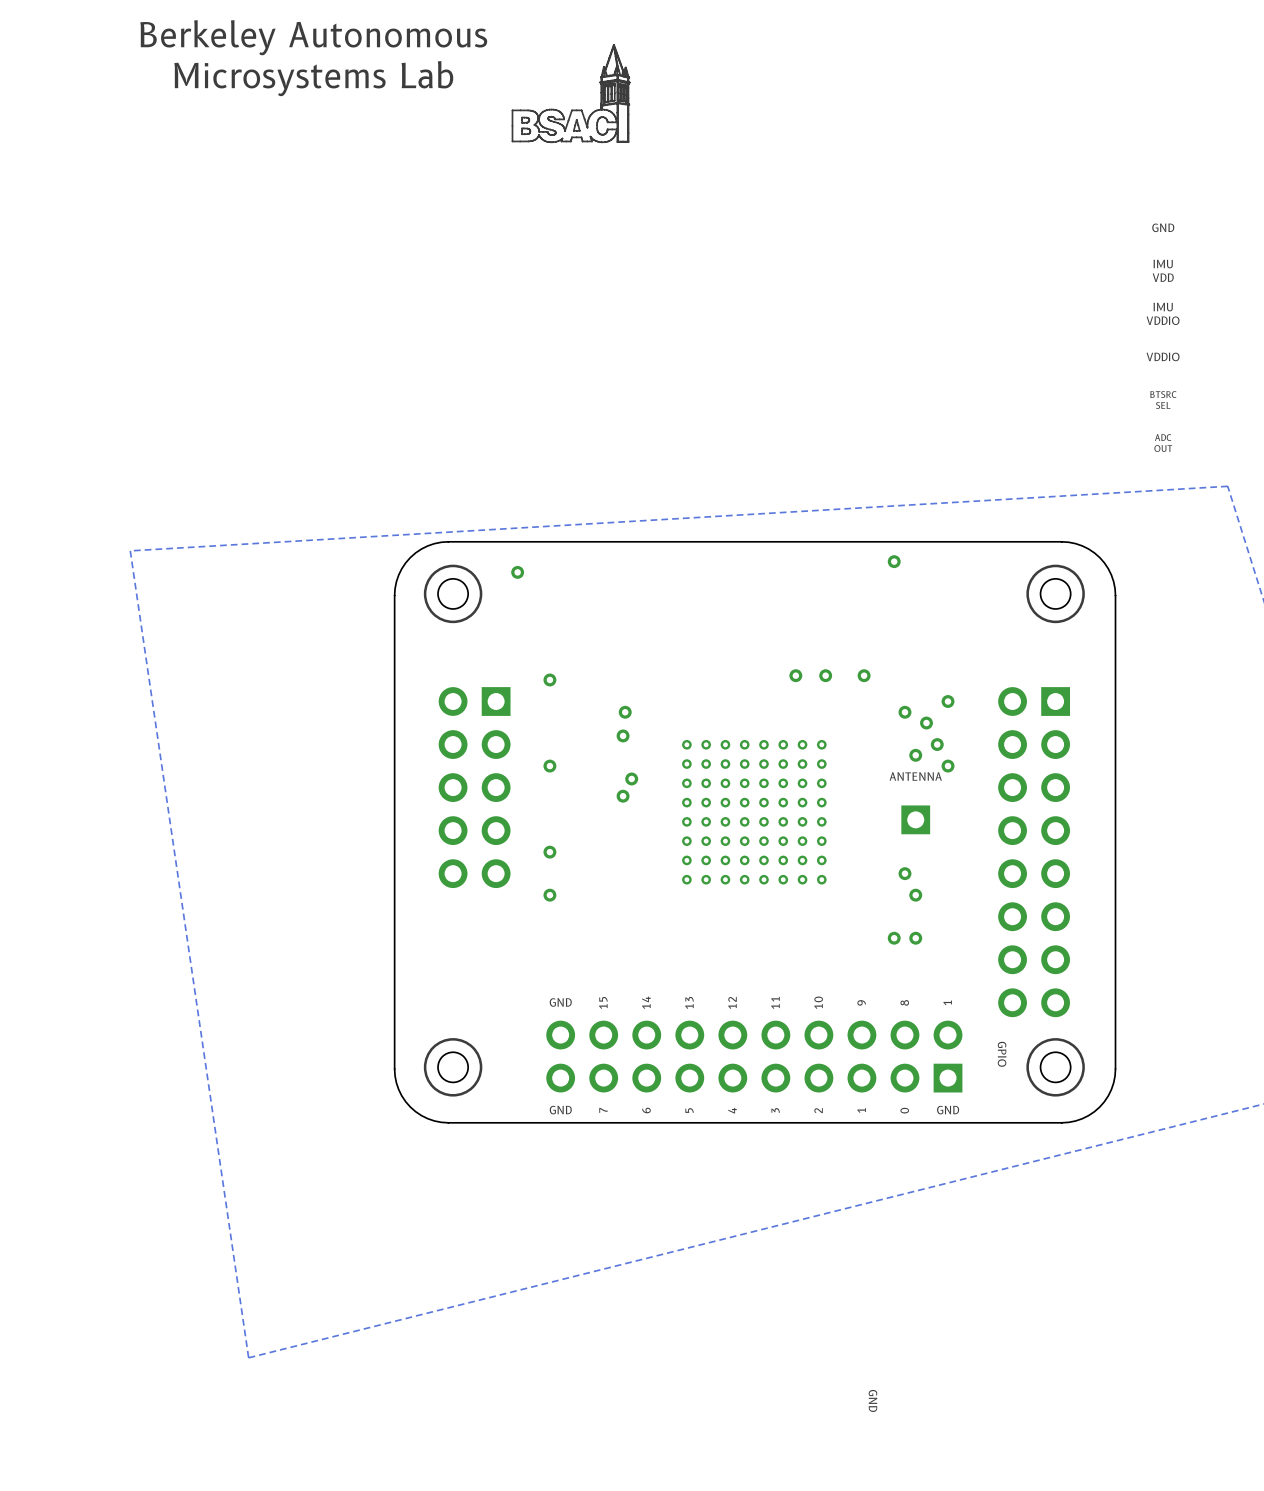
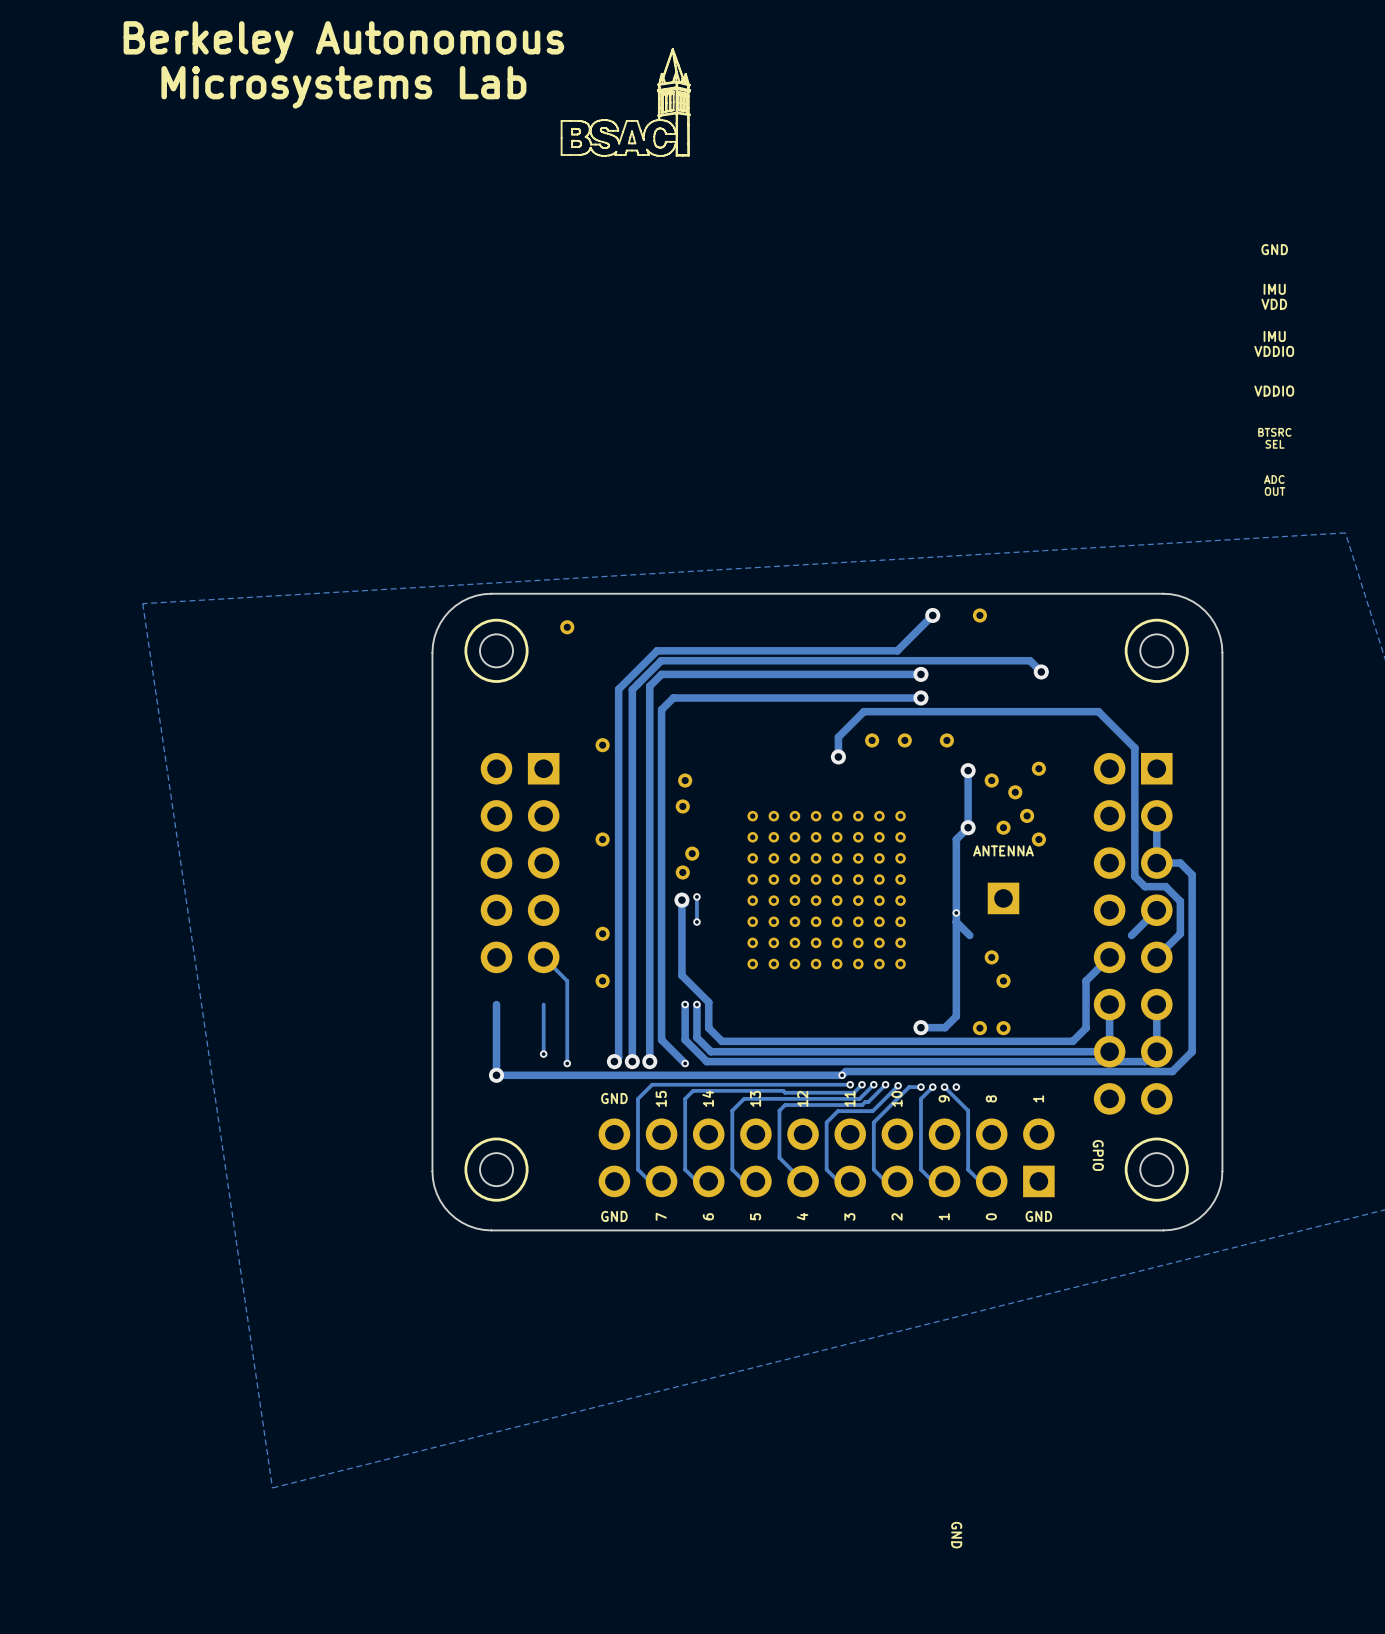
track: none -> (932, 615) (897, 650) (657, 650) (618, 689) (618, 1057) (614, 1061)
via: none -> (932, 615)
track: none -> (1041, 671) (1030, 660) (661, 660) (632, 689) (632, 1061)
via: none -> (1041, 671)
track: none -> (920, 674) (661, 674) (649, 686) (649, 1061)
via: none -> (920, 674)
track: none -> (920, 698) (673, 698) (661, 709) (661, 1039) (685, 1063)
via: none -> (920, 698)
track: none -> (838, 756) (838, 737) (863, 711) (1098, 711) (1134, 748) (1134, 876) (1144, 886) (1165, 886) (1180, 901) (1180, 933) (1156, 957)
via: none -> (838, 756)
track: none -> (968, 770) (968, 827) (956, 839) (956, 1016) (945, 1027) (920, 1027)
via: none -> (968, 770)
track: none -> (1156, 815) (1156, 863) (1180, 863) (1192, 874) (1192, 1051) (1172, 1071) (845, 1071) (842, 1075) (496, 1075) (496, 1004)
via: none -> (968, 827)
track: none -> (696, 896) (696, 922)
via: none -> (696, 896)
via: none -> (681, 900)
track: none -> (685, 903) (681, 900) (681, 975) (708, 1002) (708, 1028) (721, 1041) (1072, 1041) (1086, 1028) (1086, 980) (1109, 957)
track: none -> (1156, 910) (1131, 935)
via: none -> (956, 912)
via: none -> (696, 922)
track: none -> (956, 922) (969, 935)
track: none -> (543, 957) (567, 980) (567, 1063)
track: none -> (543, 1004) (543, 1054)
via: none -> (685, 1004)
via: none -> (696, 1004)
track: none -> (1109, 1004) (1109, 1039) (1097, 1051) (710, 1051) (696, 1037) (696, 1004)
track: none -> (1156, 1004) (1156, 1049) (1144, 1061) (706, 1061) (685, 1039) (685, 1004)
via: none -> (920, 1027)
via: none -> (543, 1054)
via: none -> (614, 1061)
via: none -> (632, 1061)
via: none -> (649, 1061)
via: none -> (567, 1063)
via: none -> (685, 1063)
via: none -> (496, 1075)
via: none -> (842, 1075)
track: none -> (850, 1084) (652, 1084) (637, 1098) (637, 1169) (649, 1181) (661, 1181)
via: none -> (850, 1084)
track: none -> (862, 1084) (854, 1092) (693, 1090) (685, 1098) (685, 1169) (696, 1181) (708, 1181)
via: none -> (862, 1084)
track: none -> (873, 1084) (859, 1098) (744, 1098) (732, 1110) (732, 1169) (744, 1181) (755, 1181)
via: none -> (873, 1084)
track: none -> (885, 1084) (868, 1102) (862, 1105) (785, 1105) (779, 1110) (779, 1157) (803, 1181)
via: none -> (885, 1084)
track: none -> (898, 1085) (872, 1111) (837, 1111) (826, 1122) (826, 1169) (838, 1181) (850, 1181)
via: none -> (898, 1085)
track: none -> (920, 1087) (909, 1087) (873, 1122) (873, 1169) (885, 1181) (897, 1181)
via: none -> (920, 1087)
track: none -> (932, 1087) (920, 1098) (920, 1169) (932, 1181) (944, 1181)
via: none -> (932, 1087)
track: none -> (944, 1087) (968, 1110) (968, 1169) (979, 1181) (991, 1181)
via: none -> (944, 1087)
via: none -> (956, 1087)

